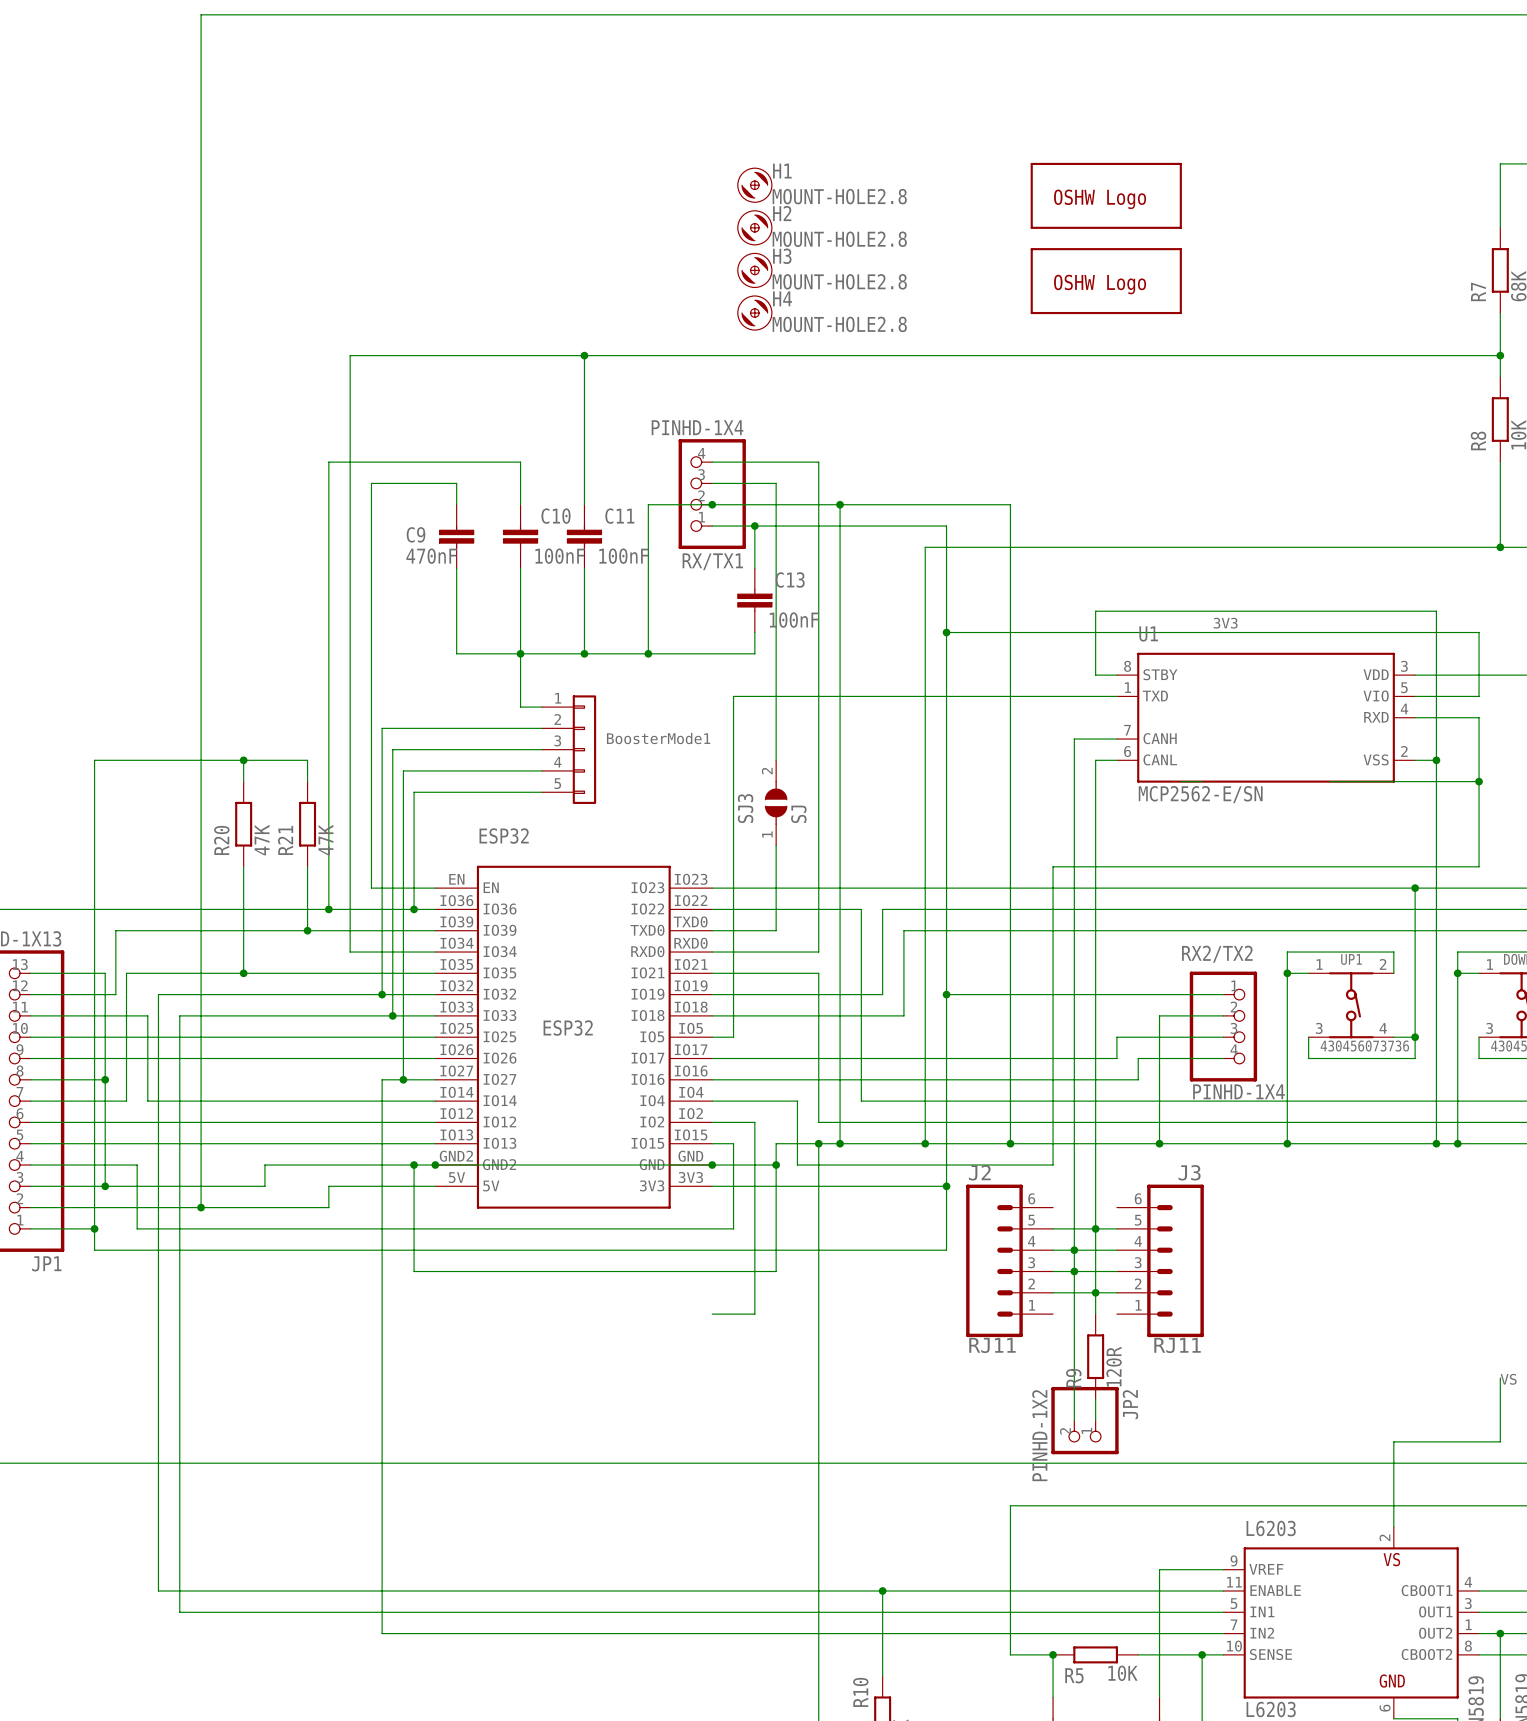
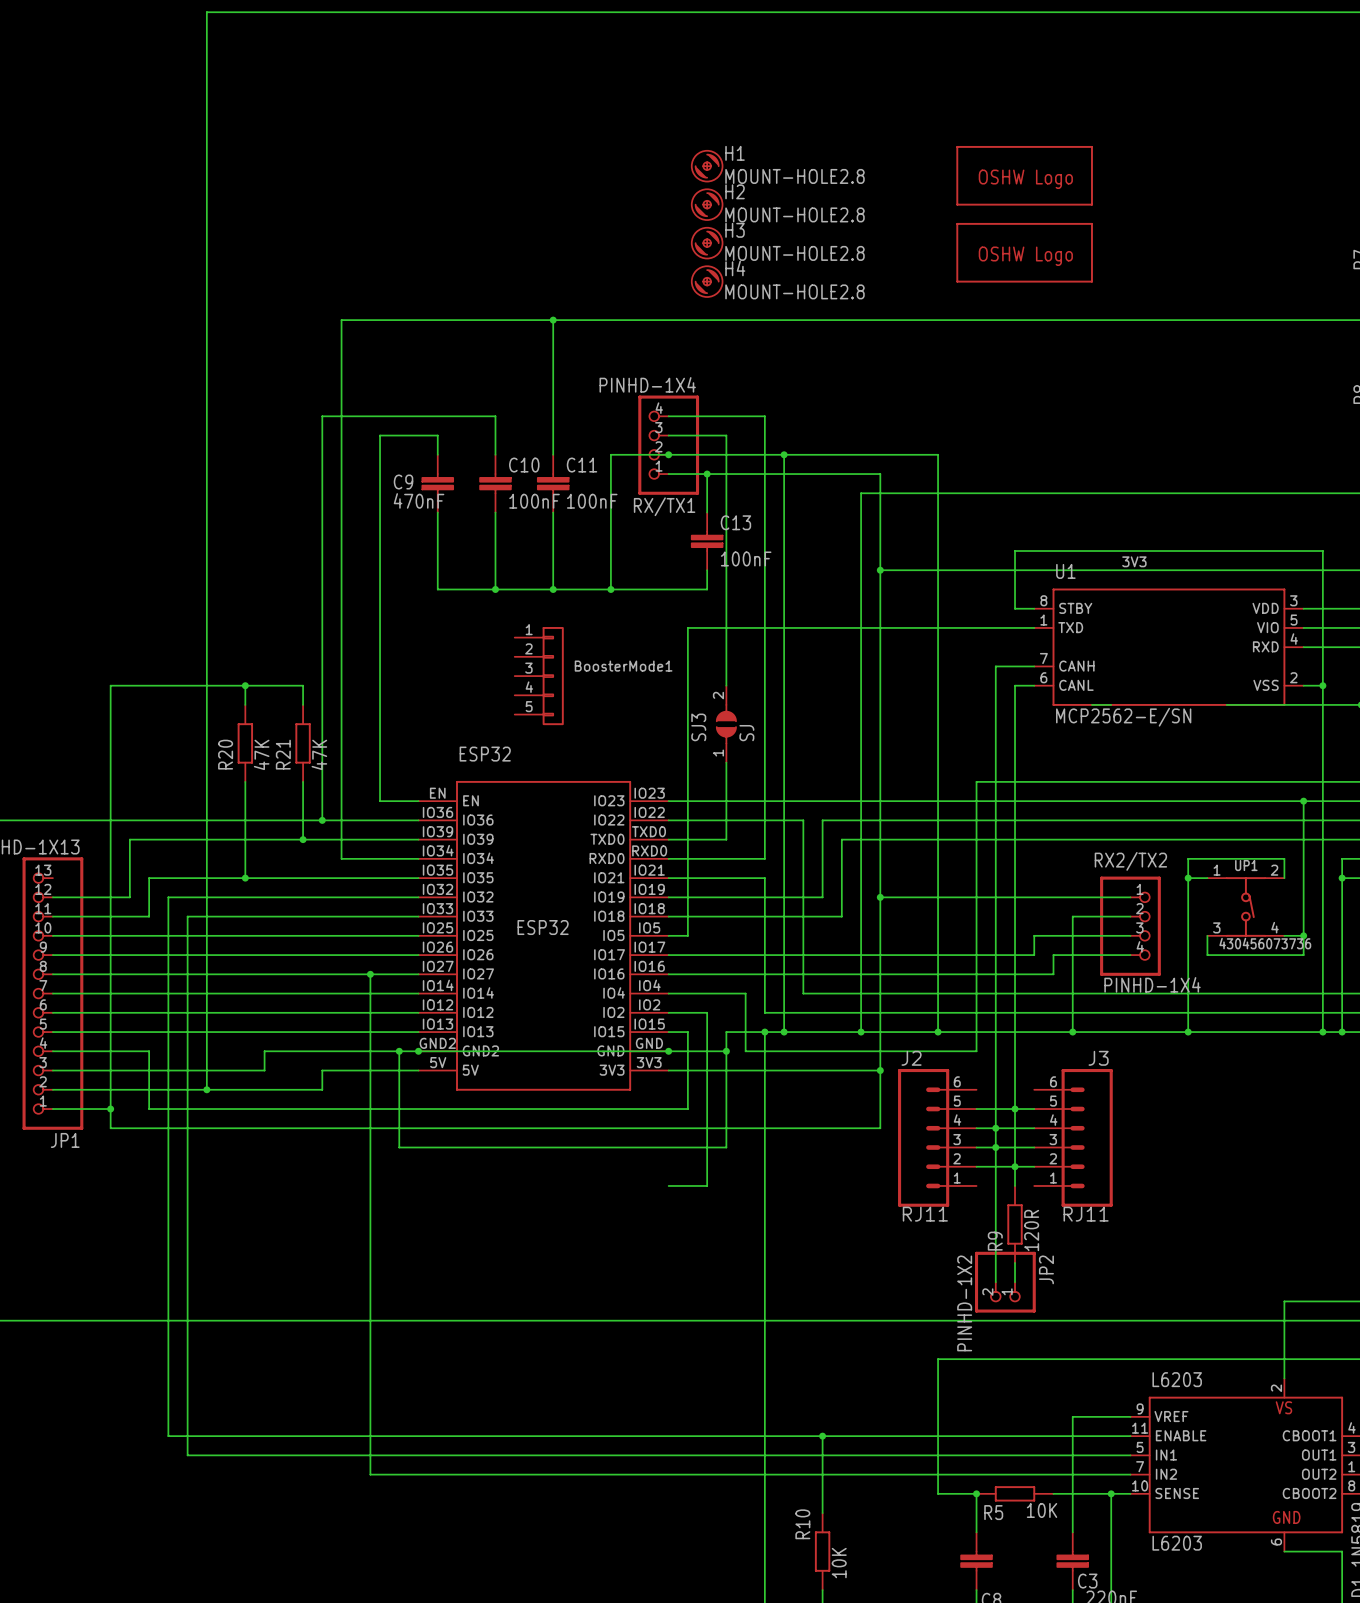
wire: (392, 483) (371, 483) (371, 888) (392, 888) (392, 1015) -> (380, 435) (380, 676)
wire: (520, 653) (520, 707) (541, 707) -> none
wire: (541, 728) (382, 728) (382, 994) -> none
wire: (392, 749) (541, 749) -> none
wire: (541, 770) (403, 770) (403, 1079) -> none
wire: (541, 792) (414, 792) (414, 909) -> none
junction: (414, 909) -> none
wire: (30, 973) (105, 973) (105, 1186) -> none
wire: (137, 973) (126, 973) (126, 1101) -> (149, 878) (149, 916)
junction: (382, 994) -> none
wire: (137, 1015) (147, 1015) (147, 1101) -> (139, 993) (158, 993)
junction: (392, 1015) -> none
wire: none -> (120, 974) (370, 974)
junction: (105, 1079) -> none
junction position: (403, 1079) -> (370, 974)
junction: (105, 1186) -> none

